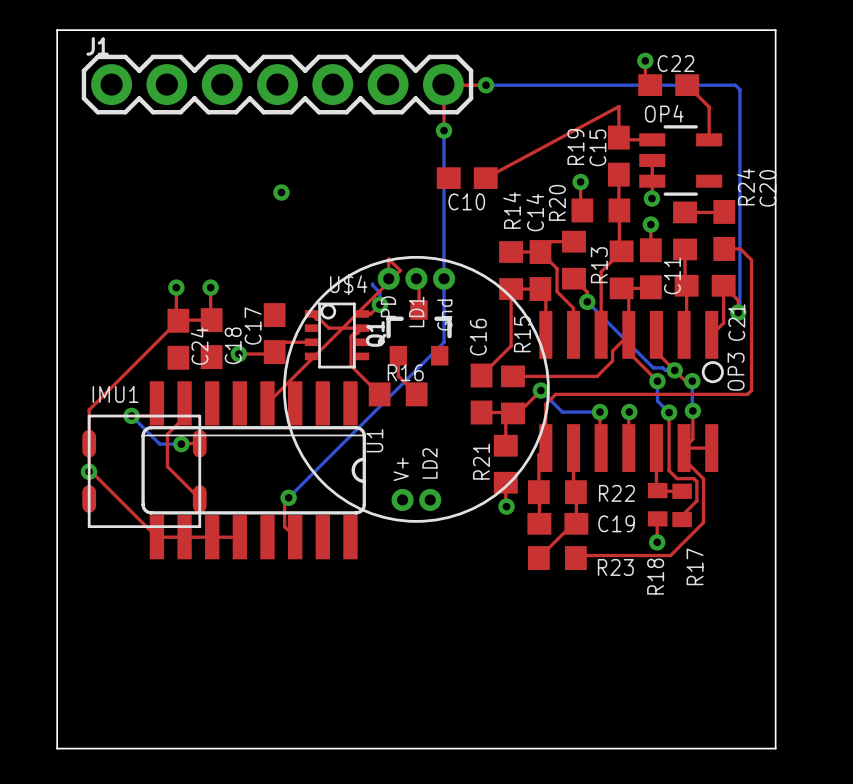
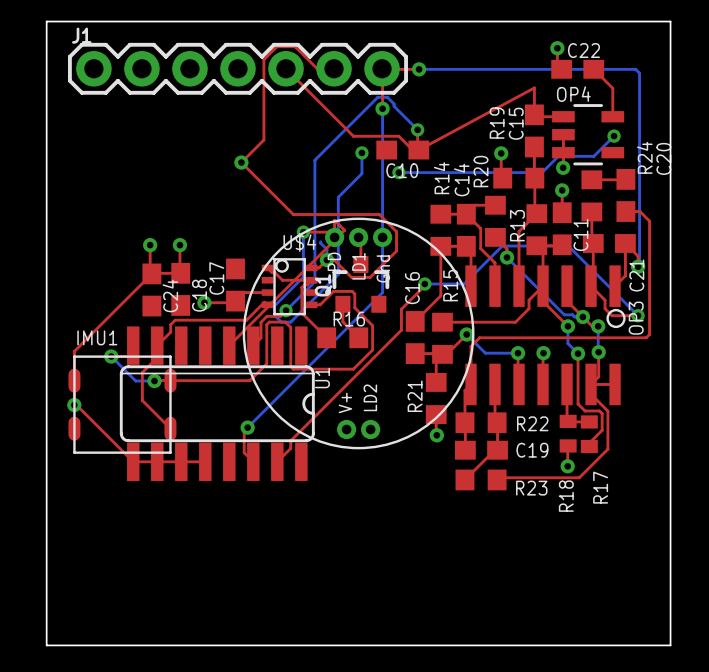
top track: none -> (286, 68) (353, 136) (398, 136) (411, 148) (417, 148) (417, 129)
top track: none -> (334, 69) (318, 69) (295, 46) (276, 46) (263, 59) (263, 140) (241, 162) (293, 214) (379, 214) (396, 231) (396, 251) (370, 277) (351, 277) (334, 260) (326, 260)
bottom track: none -> (417, 129) (387, 97) (377, 97) (314, 160) (314, 281) (286, 310)
via: none -> (417, 129)
bottom track: none -> (614, 136) (593, 156) (558, 156) (542, 172) (398, 172)
via: none -> (614, 136)
bottom track: none -> (361, 152) (361, 173) (338, 197) (338, 274) (290, 322) (281, 322) (274, 315) (274, 305) (303, 277) (303, 232)
via: none -> (361, 152)
via: none -> (398, 172)
top track: none -> (303, 232) (329, 232) (334, 237)
via: none -> (303, 232)
top track: none -> (424, 284) (401, 309) (401, 330) (290, 440) (290, 448) (277, 461)
bottom track: none -> (424, 284) (464, 284) (502, 246) (568, 246) (638, 315)
via: none -> (424, 284)
top track: none -> (591, 286) (605, 300) (605, 308) (612, 315) (638, 315)
top track: none -> (264, 302) (246, 320) (175, 320) (170, 324) (170, 332) (157, 345)
top track: none -> (311, 304) (320, 304) (333, 291) (352, 291) (354, 293) (354, 307) (372, 325) (372, 349) (353, 369) (293, 369) (290, 366) (290, 327) (285, 322) (269, 322) (266, 324) (266, 363) (249, 380) (170, 380)
top track: none -> (286, 310) (280, 316) (266, 316) (261, 322) (261, 337) (253, 345)
via: none -> (286, 310)
via: none -> (638, 315)

